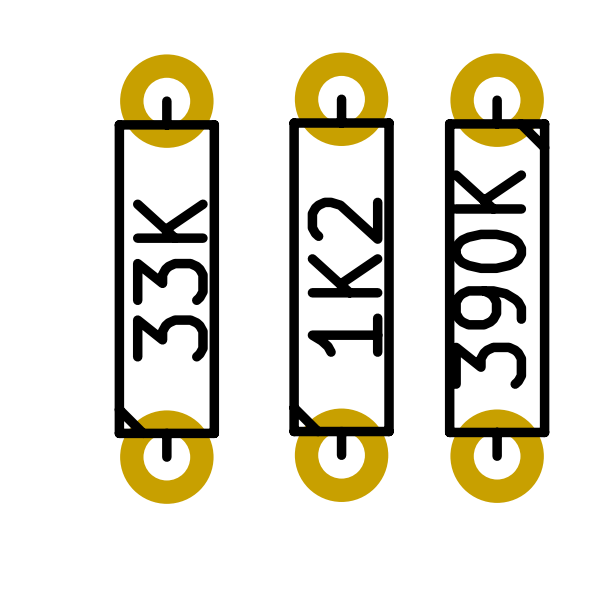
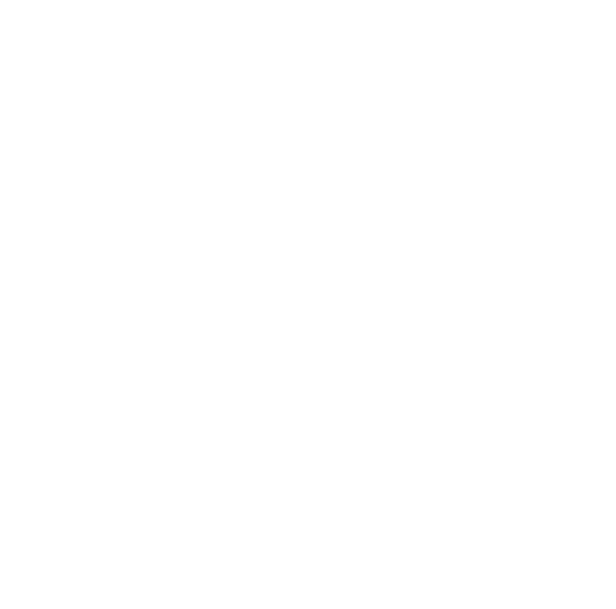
part: 1K2 (341, 277) -> none
part: 390K (497, 278) -> none
part: 33K (166, 279) -> none

